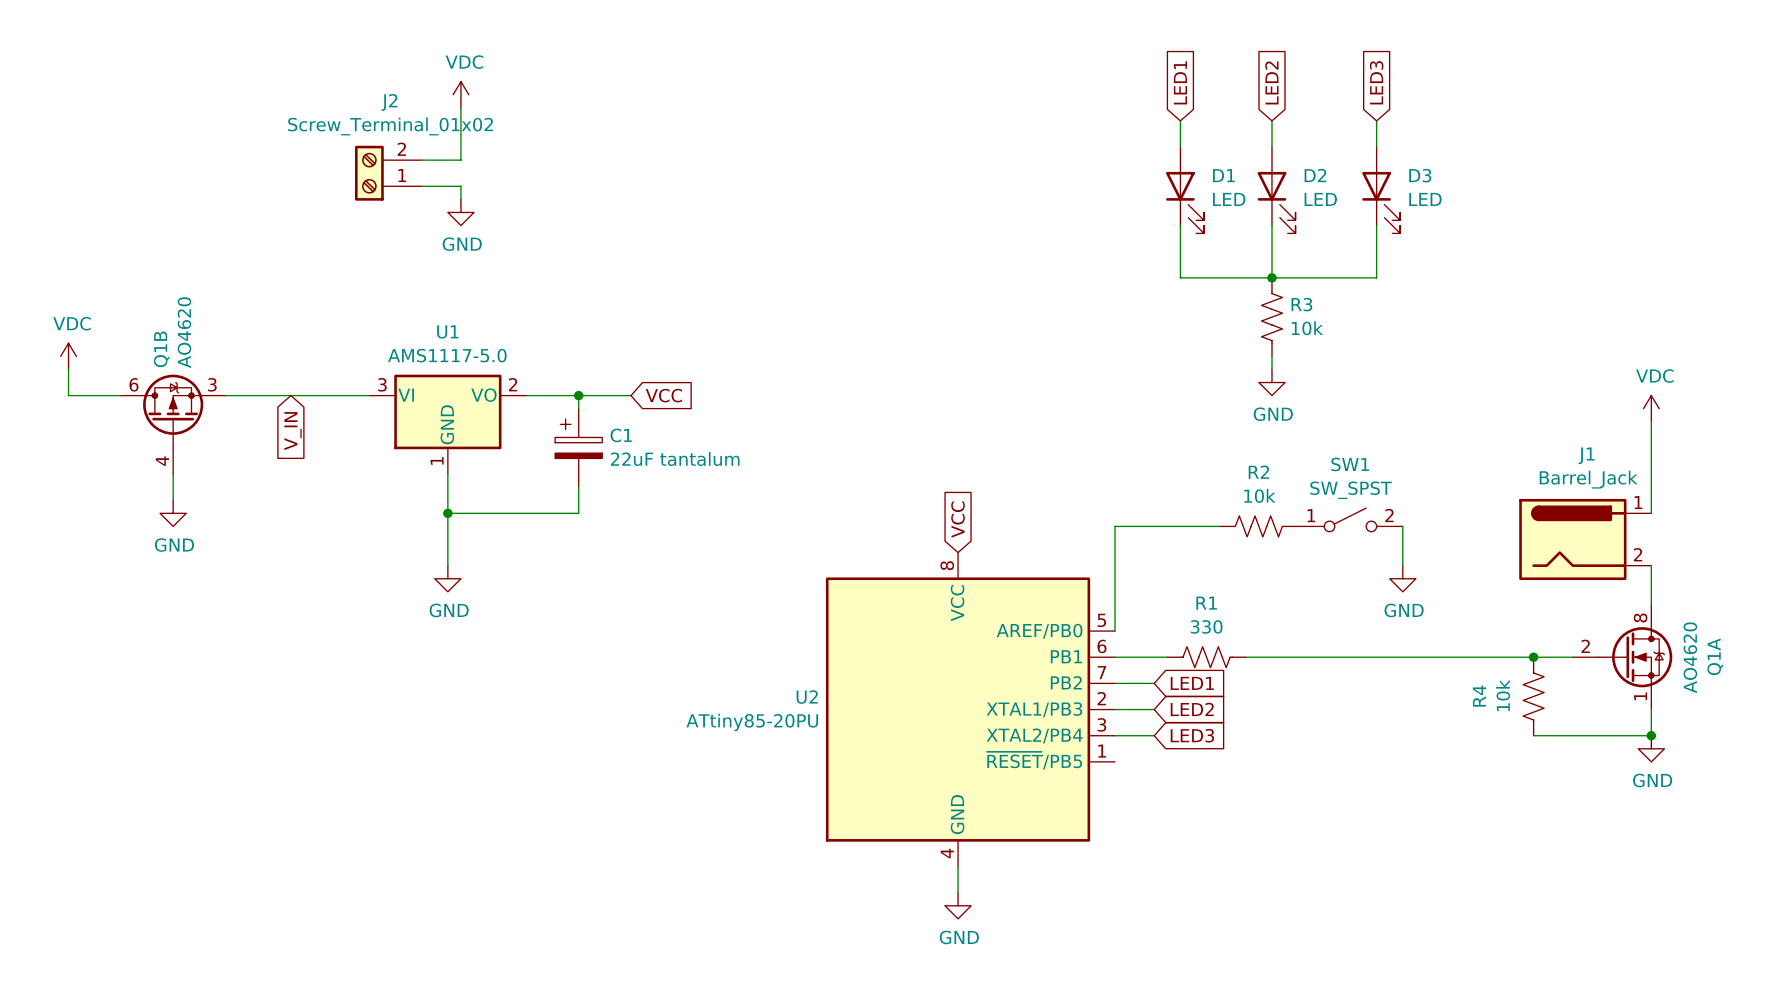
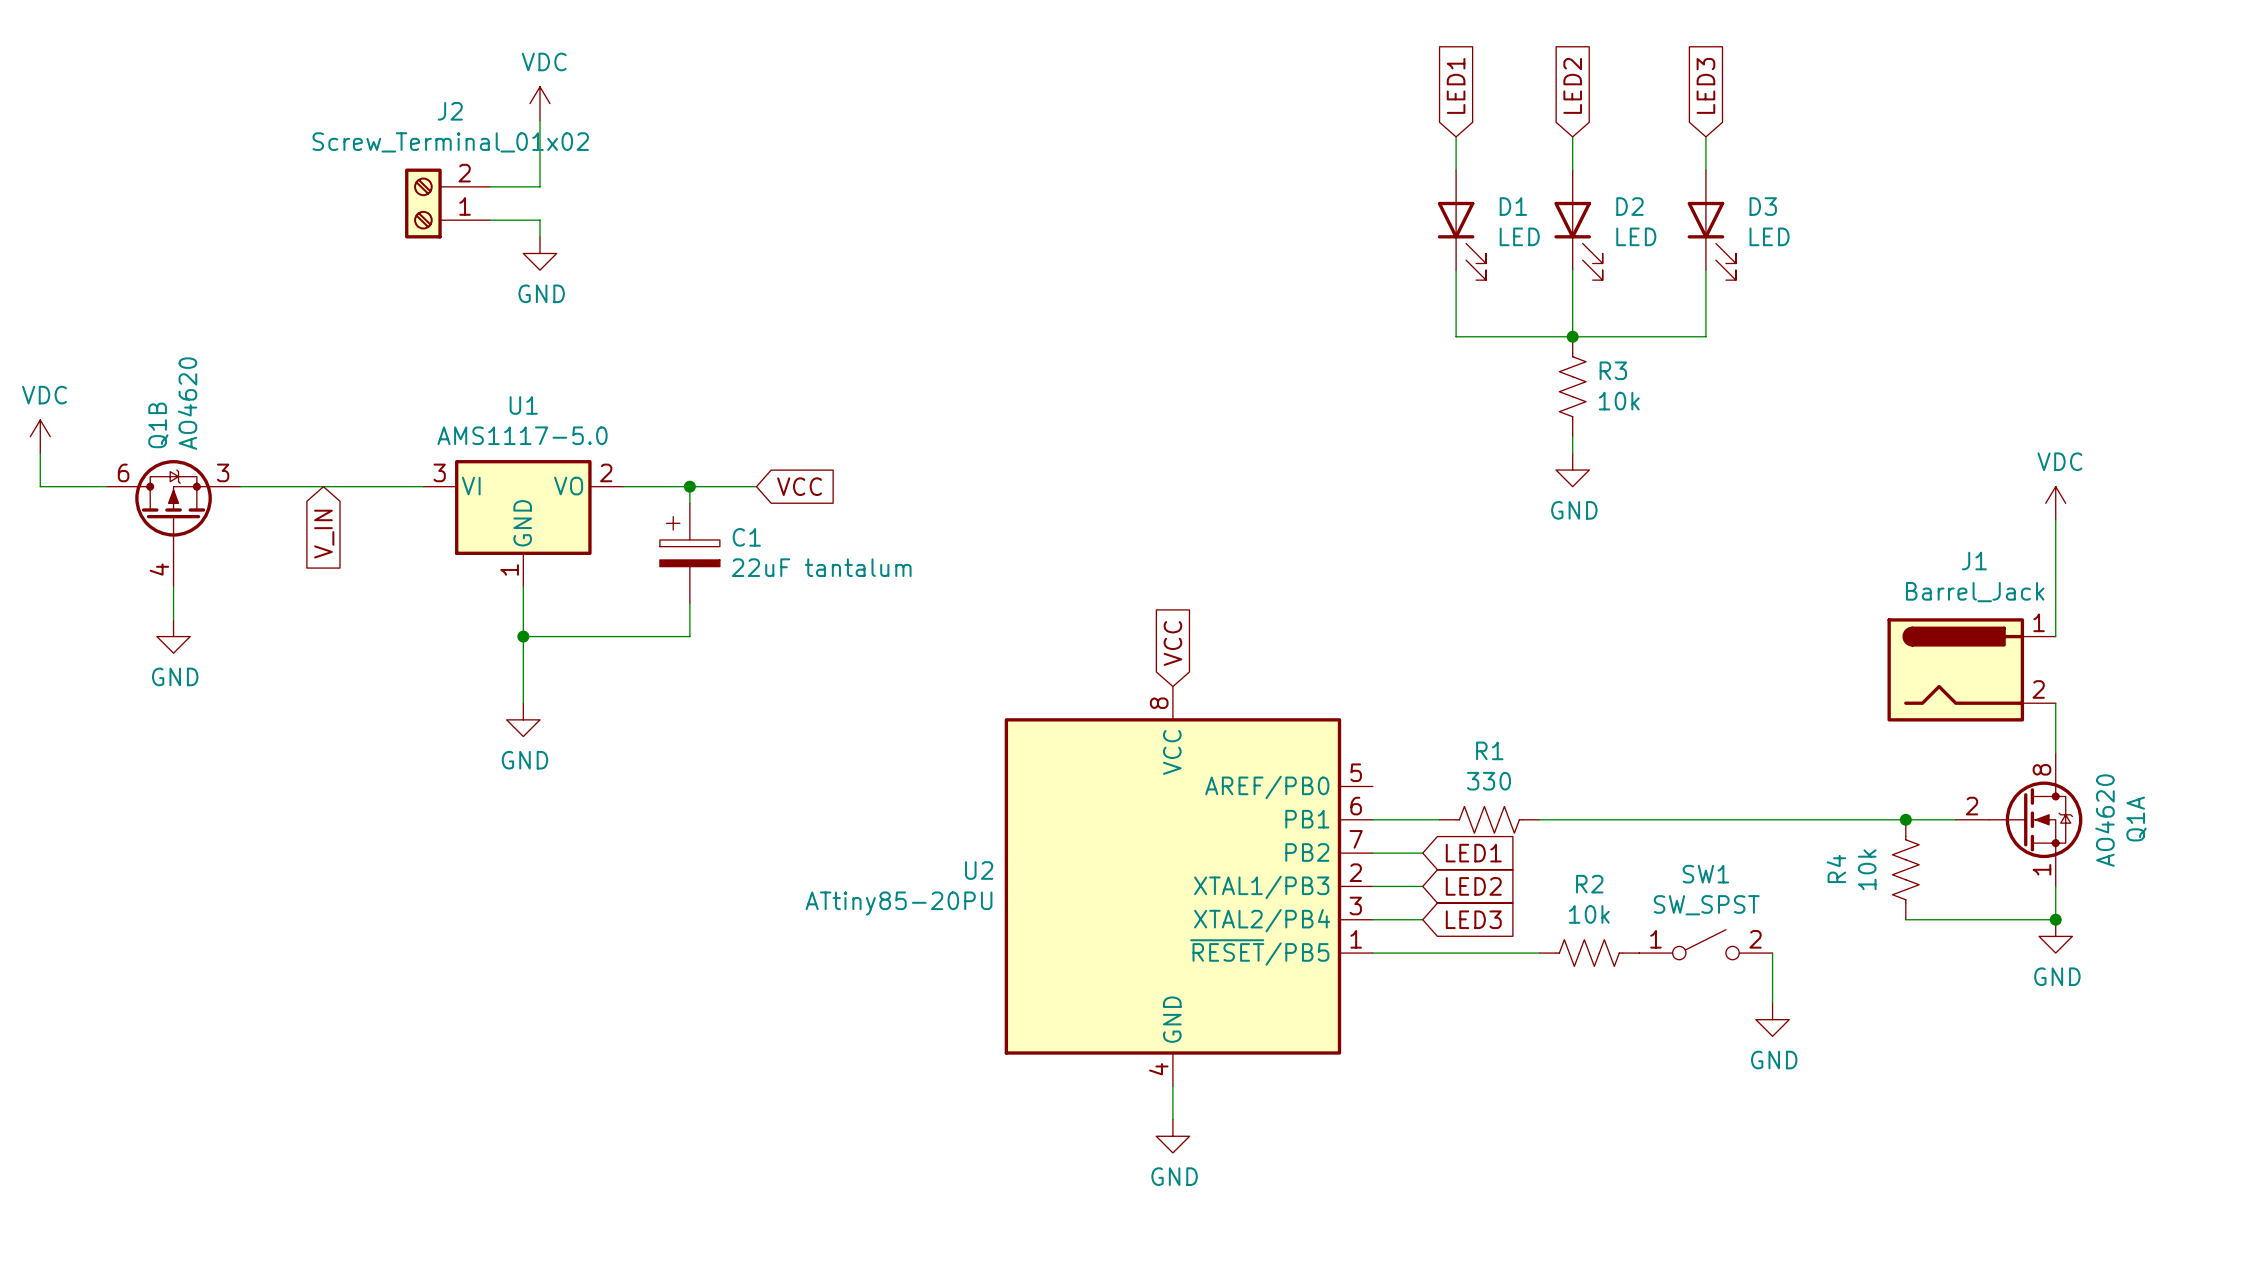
SW1 position: (1350, 519) -> (1705, 944)
wire: (1219, 526) (1115, 526) (1115, 631) -> none
R2 position: (1258, 526) -> (1589, 953)
wire: (1402, 526) (1402, 565) -> (1772, 953) (1772, 1003)
power symbol position: GND (1402, 578) -> GND (1772, 1019)
wire: none -> (1372, 953) (1539, 953)

